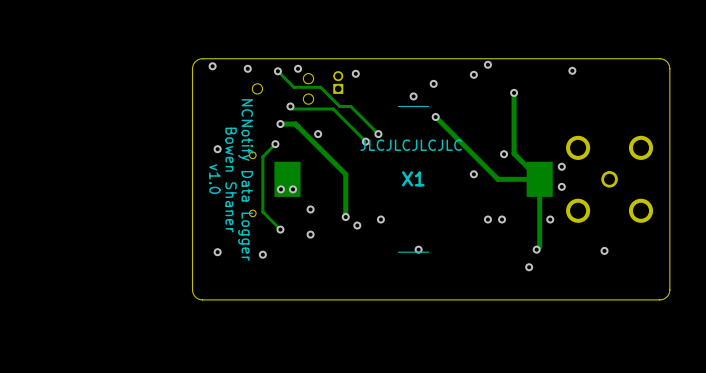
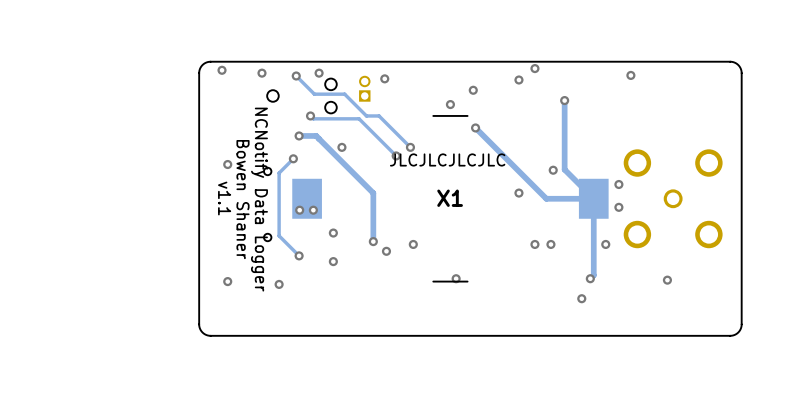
text: v1.0 (214, 179) -> v1.1 (224, 198)

